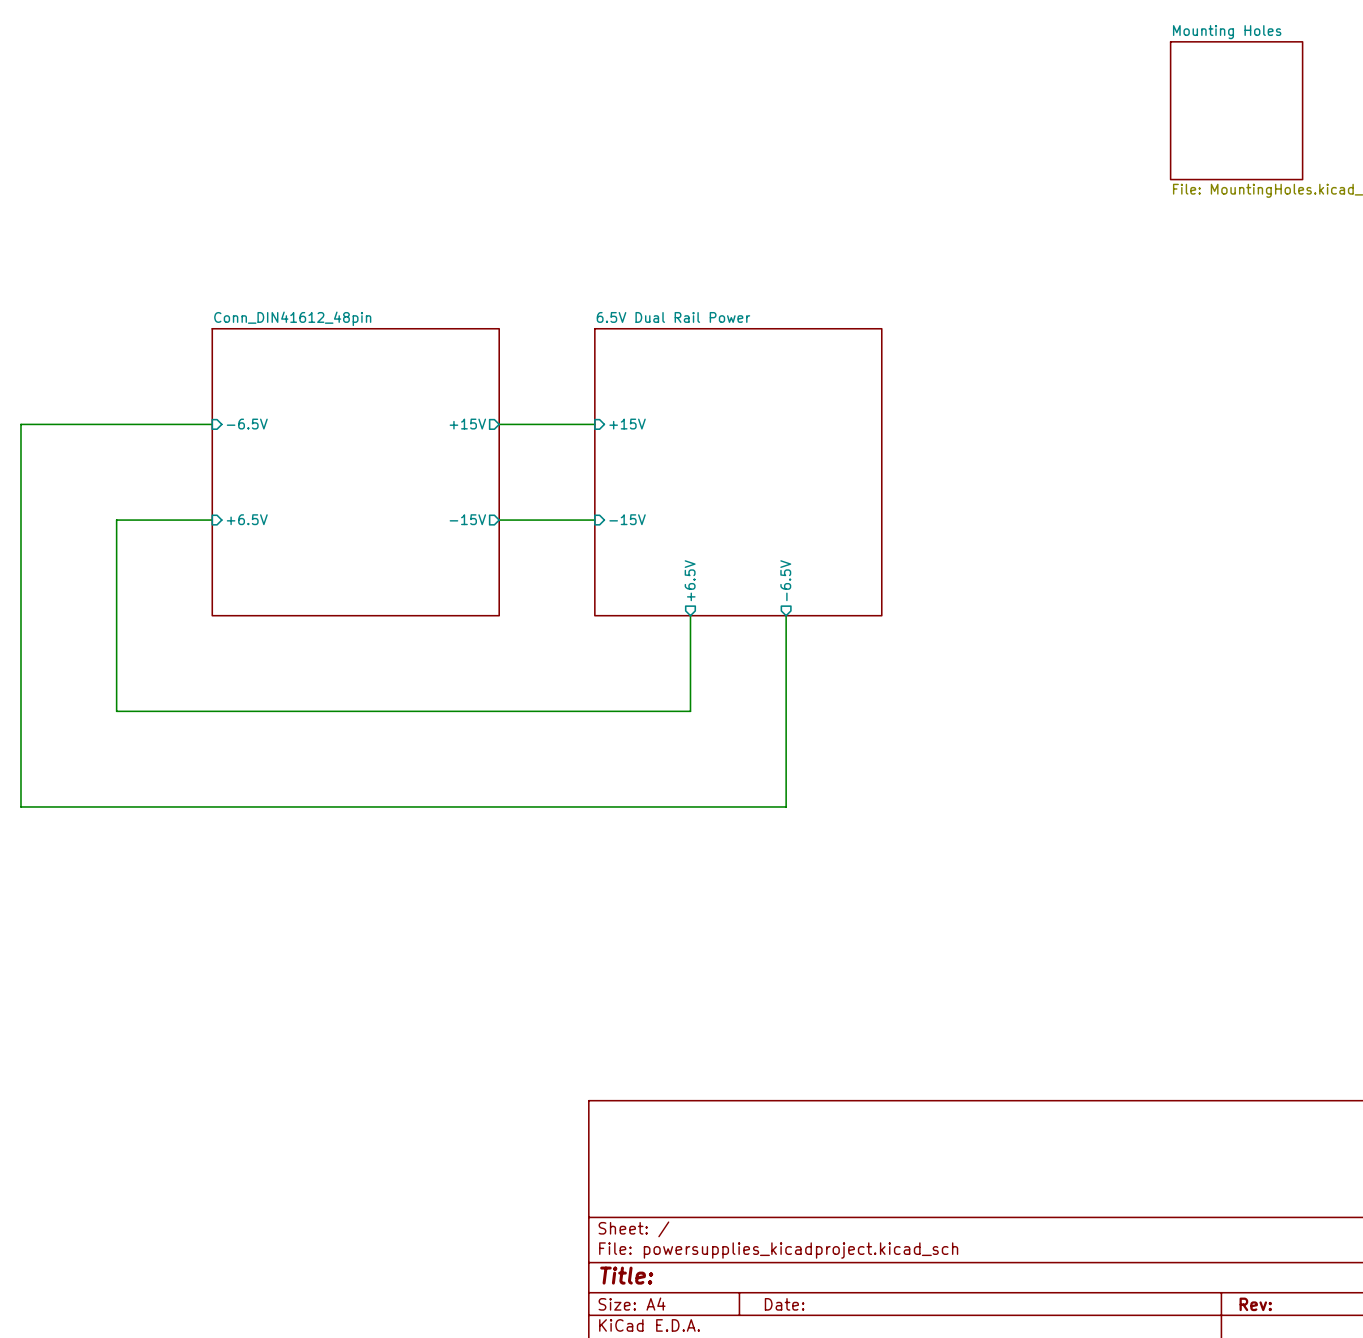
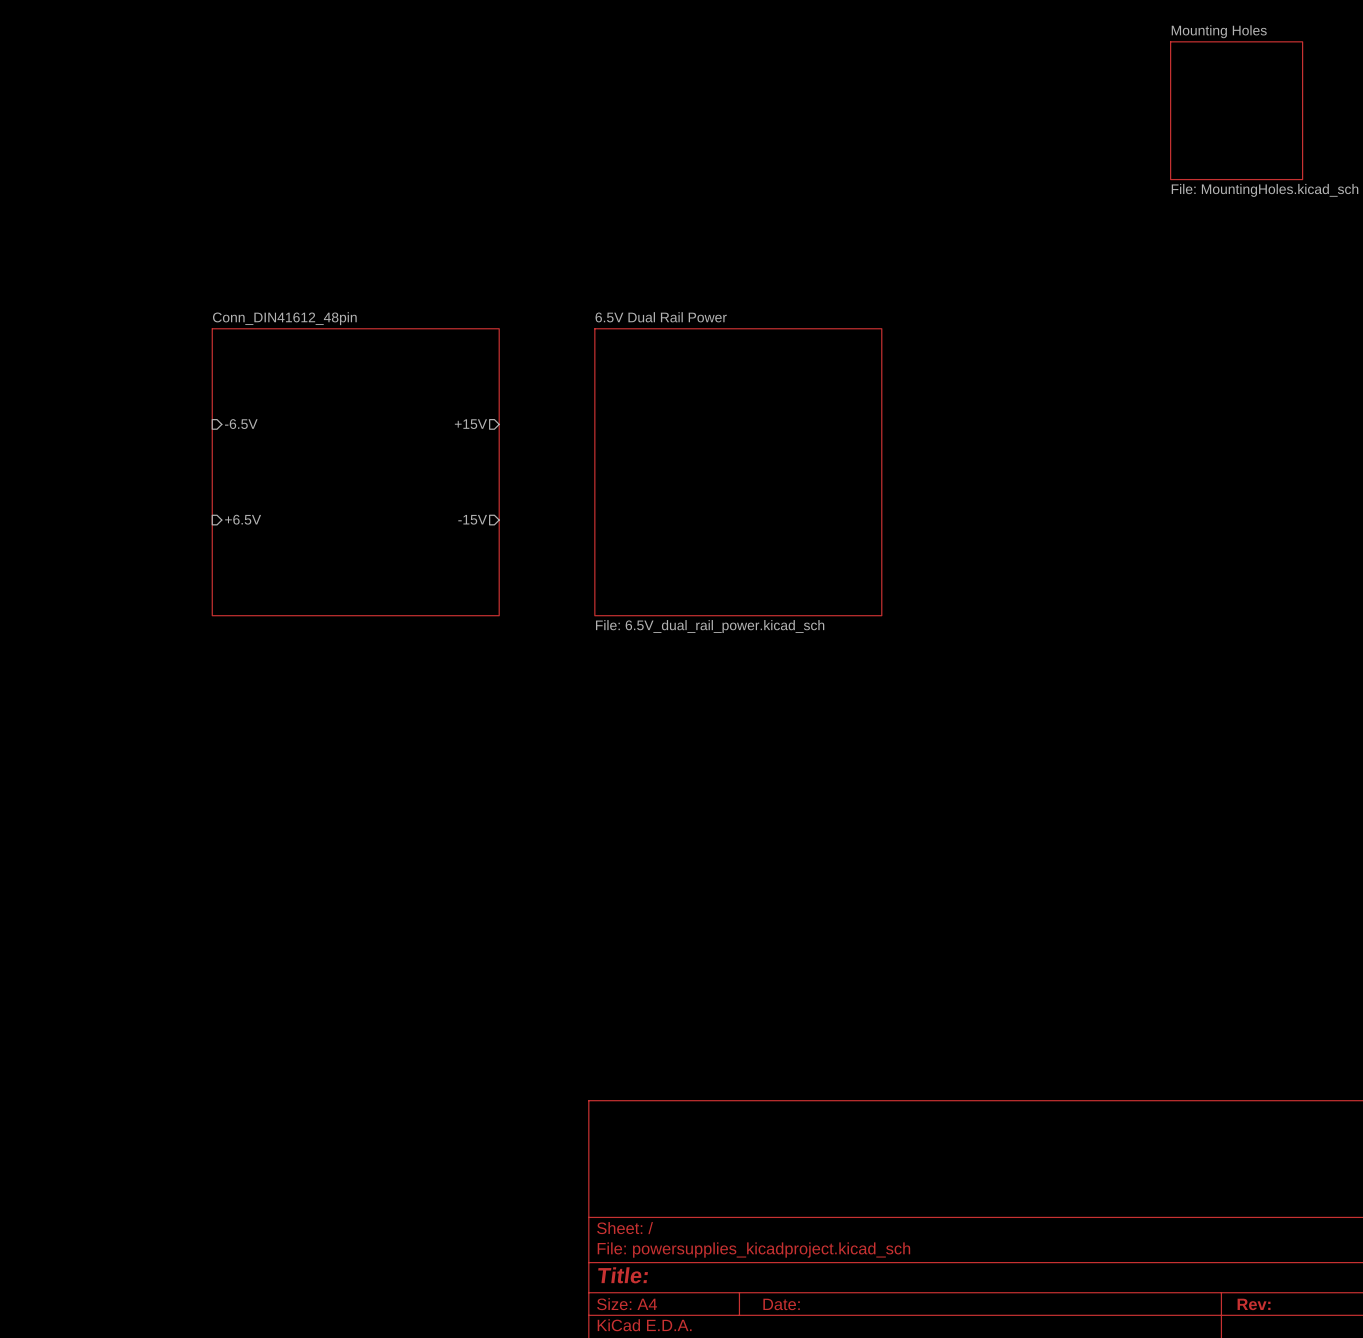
wire: (212, 424) (20, 424) (20, 806) (786, 806) (786, 615) -> none
wire: (499, 424) (594, 424) -> none
sheet pin: +15V (627, 424) -> none
sheet pin: -15V (627, 519) -> none
wire: (212, 520) (116, 520) (116, 711) (690, 711) (690, 615) -> none
wire: (499, 520) (594, 520) -> none
sheet pin: +6.5V (690, 580) -> none
sheet pin: -6.5V (785, 580) -> none
sheet 6.5V Dual Rail Power value: none -> File: 6.5V_dual_rail_power.kicad_sch (710, 626)

